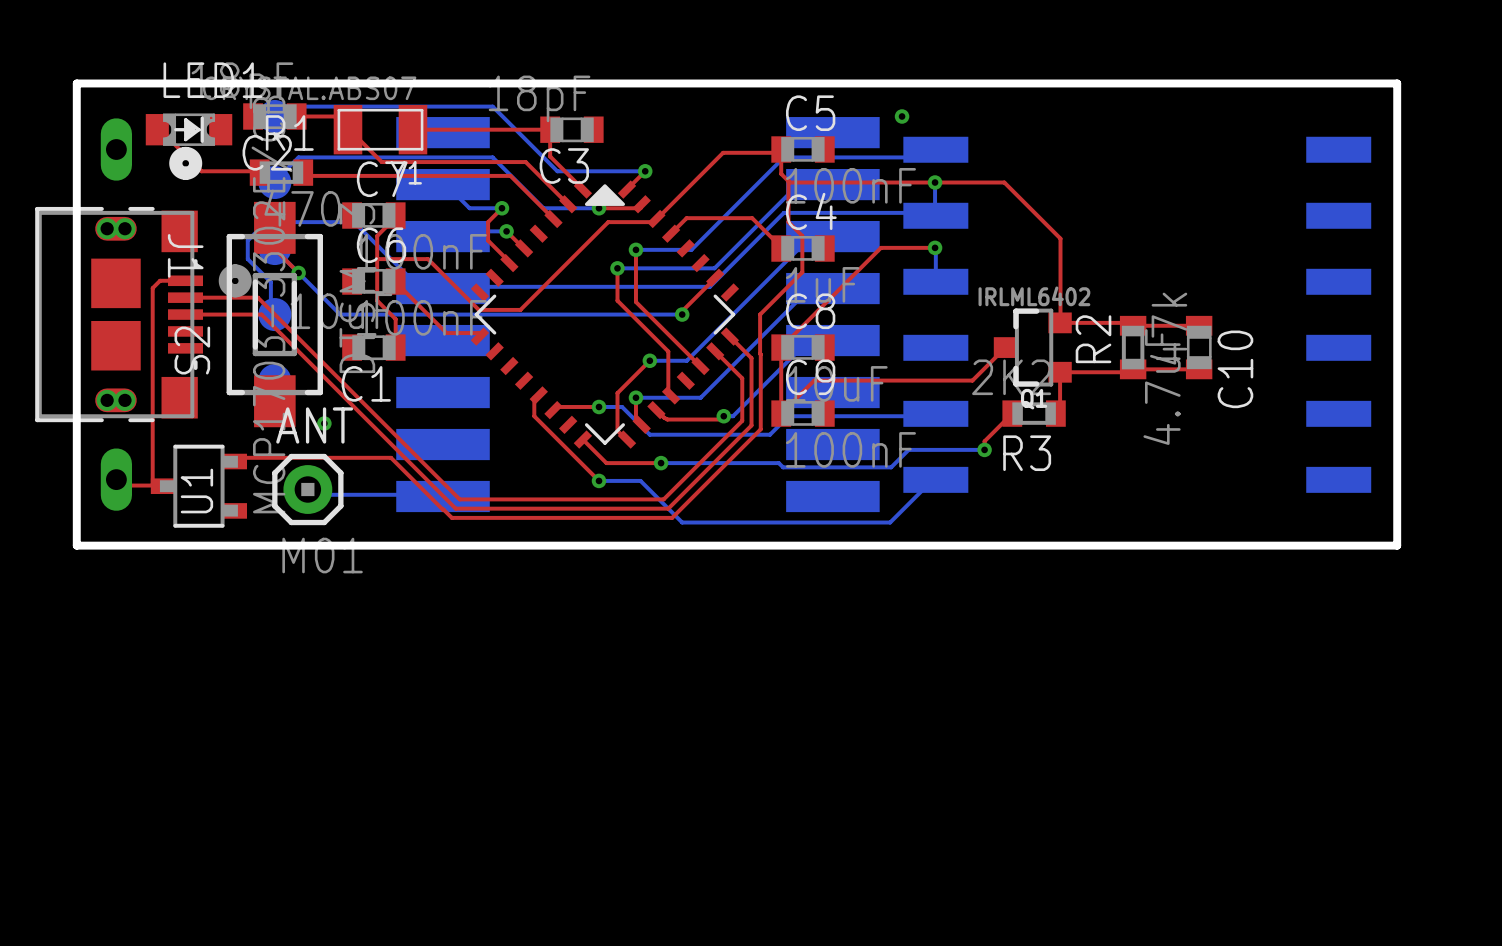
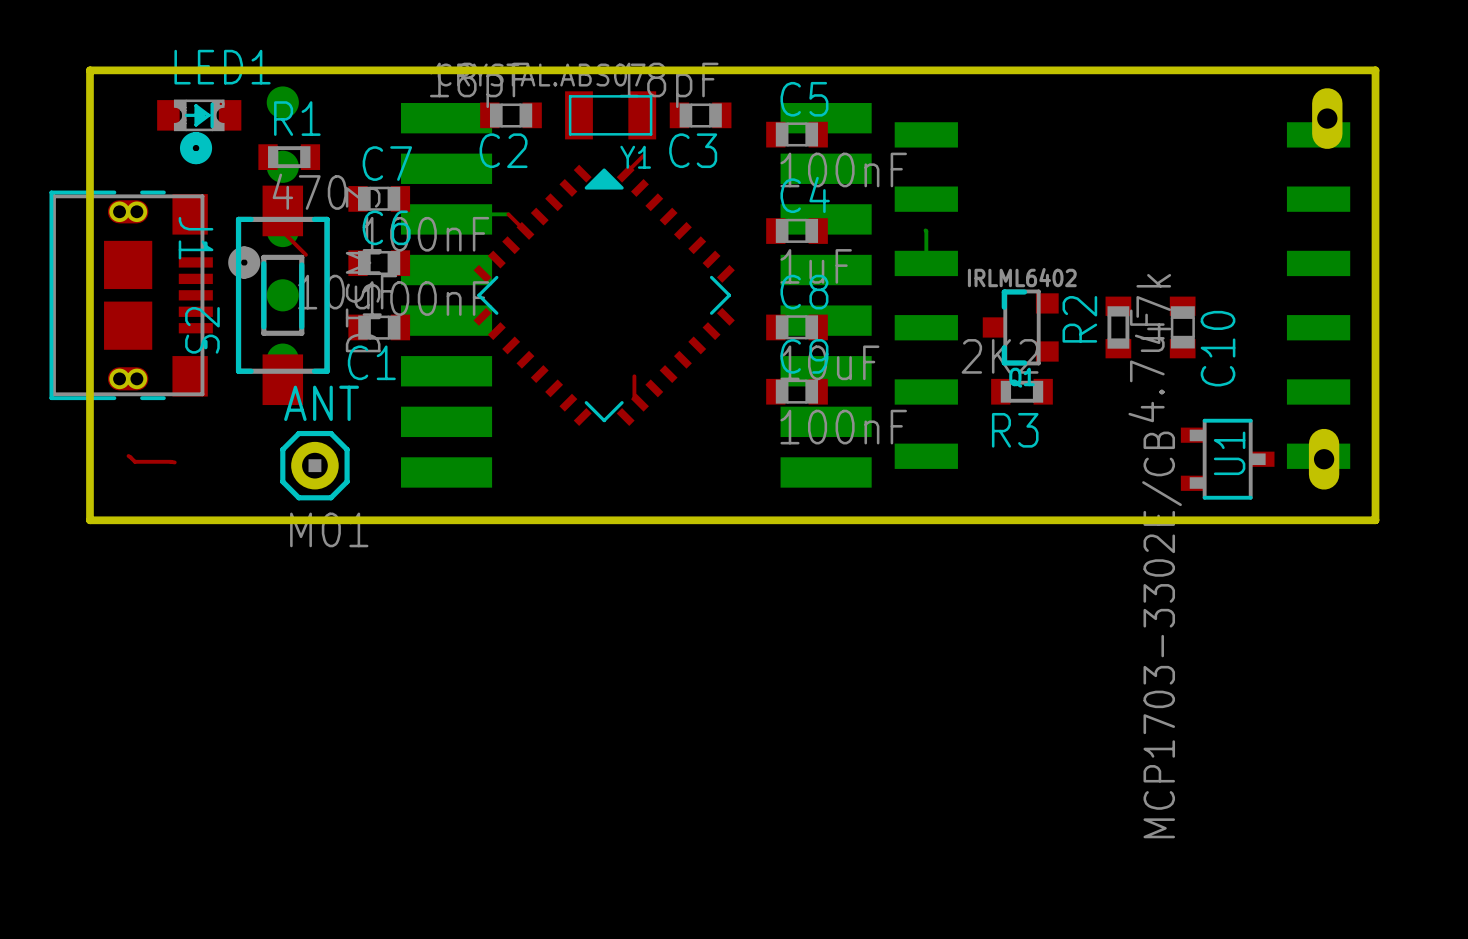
bottom track: (274, 116) (284, 106) (492, 106) (557, 171) (645, 171) -> none
C2 position: (274, 116) -> (510, 115)
top track: (296, 116) (334, 116) (381, 162) (525, 162) (567, 204) -> none
via: (902, 116) -> none
top track: (157, 129) (159, 129) (201, 171) (259, 172) -> none
Y1 position: (380, 129) -> (610, 115)
top track: (412, 129) (550, 129) (550, 156) (582, 189) -> none
C3 position: (571, 129) -> (700, 115)
part: none -> (1327, 118)
part: (116, 149) -> none
bottom track: (935, 149) (927, 157) (783, 157) (691, 249) (635, 249) -> none
via: (645, 171) -> none
top track: (303, 172) (303, 175) (510, 175) (553, 218) -> none
top track: (788, 180) (788, 222) (802, 235) (802, 272) (760, 314) (760, 429) (672, 517) (451, 517) (391, 457) (238, 457) (234, 461) -> none
bottom track: (274, 182) (298, 157) (492, 157) (543, 208) (599, 208) -> none
bottom track: (935, 182) (935, 209) (931, 212) -> none
via: (935, 182) -> none
bottom track: (443, 184) (446, 185) (469, 208) (501, 208) -> none
bottom track: (832, 184) (797, 185) (714, 268) (617, 268) -> none
top track: (641, 204) (640, 208) (599, 208) -> none
top track: (501, 208) (488, 222) (488, 240) (509, 263) -> none
via: (501, 208) -> none
via: (599, 208) -> none
bottom track: (931, 212) (783, 212) (709, 286) (446, 286) (443, 288) (441, 286) (418, 286) (354, 222) (266, 222) (247, 240) (247, 259) (270, 282) (270, 314) (274, 314) -> none
top track: (395, 215) (377, 235) (377, 300) (395, 319) (395, 347) -> none
via: (506, 231) -> none
top track: (671, 233) (686, 218) (752, 218) (781, 248) -> none
bottom track: (832, 236) (830, 240) (806, 240) (686, 360) (649, 360) -> none
top track: (935, 247) (880, 247) (781, 347) (781, 413) (814, 380) (972, 380) (1005, 347) -> none
via: (935, 247) -> none
bottom track: (274, 248) (340, 314) (682, 314) -> none
top track: (635, 249) (635, 302) (700, 366) -> none
via: (635, 249) -> none
top track: (377, 259) (428, 259) (478, 309) (520, 309) (608, 222) (654, 222) (723, 152) (779, 152) (781, 149) (781, 173) (789, 182) (1004, 182) (1060, 238) (1060, 322) (1199, 325) -> none
top track: (617, 268) (617, 300) (668, 351) (668, 393) (671, 395) -> none
via: (617, 268) -> none
via: (298, 272) -> none
top track: (715, 278) (682, 311) (682, 314) -> none
top track: (185, 280) (160, 280) (152, 288) (152, 485) -> none
top track: (395, 281) (446, 333) (478, 333) (479, 336) -> none
bottom track: (832, 288) (830, 291) (806, 291) (700, 397) (635, 397) -> none
top track: (185, 297) (257, 297) (459, 499) (663, 499) (742, 420) (742, 378) (715, 351) -> none
top track: (185, 314) (261, 314) (455, 508) (668, 508) (751, 425) (751, 358) (729, 336) -> none
via: (682, 314) -> none
bottom track: (832, 340) (830, 342) (806, 342) (733, 416) (723, 416) -> none
top track: (649, 360) (617, 393) (617, 430) (627, 439) -> none
via: (649, 360) -> none
top track: (1199, 369) (1060, 372) (1060, 409) (1055, 413) -> none
top track: (538, 395) (534, 397) (534, 416) (599, 480) -> none
via: (635, 397) -> none
top track: (599, 406) (557, 406) (553, 410) -> none
bottom track: (599, 406) (622, 406) (649, 434) (770, 434) (788, 416) (931, 416) (935, 413) -> none
via: (599, 406) -> none
top track: (656, 410) (667, 419) (720, 419) (723, 416) -> none
top track: (1012, 413) (984, 441) (984, 449) -> none
via: (723, 416) -> none
via: (324, 423) -> none
top track: (582, 439) (606, 463) (661, 463) -> none
bottom track: (984, 449) (908, 449) (891, 467) (783, 467) (778, 463) (661, 463) -> none
via: (984, 449) -> none
via: (661, 463) -> none
part: (116, 479) -> none
bottom track: (935, 479) (931, 480) (890, 522) (682, 522) (640, 480) (599, 480) -> none
via: (599, 480) -> none
part: none -> (1324, 459)
U1 rotation: 0° (198, 486) -> 180° (1227, 459)
U1 position: (198, 486) -> (1227, 459)
bottom track: (307, 489) (312, 494) (441, 494) (443, 496) -> none

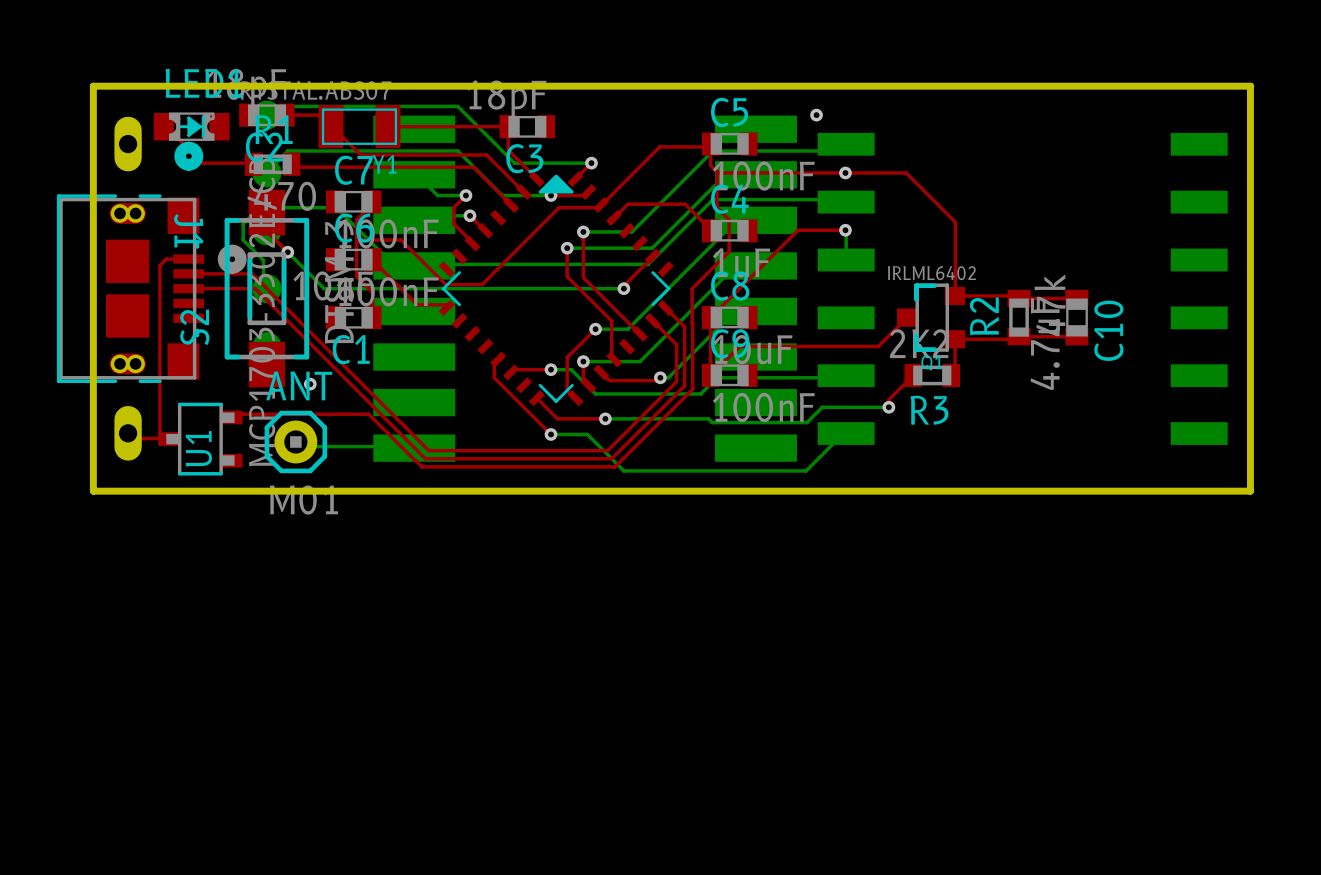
bottom track: none -> (266, 115) (275, 106) (457, 106) (514, 163) (591, 163)
top track: none -> (286, 115) (319, 115) (360, 155) (486, 155) (523, 191)
via: none -> (816, 115)
top track: none -> (163, 126) (166, 126) (202, 163) (253, 164)
top track: none -> (387, 126) (508, 126) (508, 150) (536, 179)
C2 position: (510, 115) -> (266, 115)
Y1 position: (610, 115) -> (359, 126)
C3 position: (700, 115) -> (527, 126)
part: (1327, 118) -> none
part: none -> (128, 144)
bottom track: none -> (846, 144) (838, 150) (712, 150) (631, 231) (583, 231)
via: none -> (591, 163)
top track: none -> (291, 164) (291, 167) (473, 167) (511, 204)
top track: none -> (717, 171) (717, 207) (729, 219) (729, 251) (692, 288) (692, 389) (615, 466) (422, 466) (368, 414) (235, 414) (231, 417)
bottom track: none -> (266, 172) (287, 150) (457, 150) (502, 195) (551, 195)
via: none -> (845, 172)
bottom track: none -> (414, 174) (417, 175) (437, 195) (465, 195)
bottom track: none -> (755, 174) (725, 175) (652, 248) (567, 248)
top track: none -> (588, 192) (587, 195) (551, 195)
top track: none -> (465, 195) (453, 207) (453, 223) (472, 243)
via: none -> (465, 195)
via: none -> (551, 195)
top track: none -> (372, 201) (356, 219) (356, 276) (372, 292) (372, 317)
bottom track: none -> (846, 202) (842, 199) (712, 199) (648, 264) (417, 264) (414, 265) (393, 264) (336, 207) (259, 207) (243, 223) (243, 240) (263, 260) (263, 288) (266, 288)
via: none -> (470, 215)
top track: none -> (614, 217) (627, 204) (685, 204) (710, 230)
bottom track: none -> (755, 220) (753, 223) (733, 223) (627, 329) (595, 329)
top track: none -> (845, 230) (798, 230) (710, 317) (710, 375) (739, 346) (878, 346) (907, 317)
via: none -> (845, 230)
bottom track: none -> (266, 230) (324, 288) (623, 288)
top track: none -> (583, 231) (583, 277) (639, 333)
via: none -> (583, 231)
top track: none -> (356, 240) (401, 240) (445, 284) (482, 284) (559, 207) (599, 207) (659, 146) (708, 146) (710, 144) (710, 165) (718, 172) (906, 172) (955, 222) (955, 295) (1076, 298)
top track: none -> (567, 248) (567, 276) (611, 321) (611, 357) (614, 359)
via: none -> (567, 248)
via: none -> (287, 252)
top track: none -> (652, 256) (623, 285) (623, 288)
top track: none -> (188, 259) (166, 259) (159, 265) (159, 438)
top track: none -> (372, 259) (417, 304) (445, 304) (446, 308)
bottom track: none -> (755, 265) (753, 268) (733, 268) (640, 361) (583, 361)
top track: none -> (188, 273) (252, 273) (428, 450) (607, 450) (676, 381) (676, 344) (652, 320)
top track: none -> (188, 288) (255, 288) (425, 458) (611, 458) (684, 385) (684, 326) (665, 308)
via: none -> (623, 288)
bottom track: none -> (755, 311) (733, 312) (668, 377) (660, 377)
top track: none -> (595, 329) (567, 357) (567, 390) (575, 398)
via: none -> (595, 329)
top track: none -> (1076, 336) (955, 339) (955, 371) (951, 375)
top track: none -> (498, 359) (494, 361) (494, 377) (551, 434)
via: none -> (583, 361)
top track: none -> (551, 369) (514, 369) (511, 372)
bottom track: none -> (551, 369) (571, 369) (595, 393) (700, 393) (717, 377) (842, 377) (846, 375)
via: none -> (551, 369)
top track: none -> (601, 372) (610, 380) (657, 380) (660, 377)
top track: none -> (913, 375) (888, 399) (888, 407)
via: none -> (660, 377)
via: none -> (310, 384)
top track: none -> (536, 398) (557, 418) (605, 418)
bottom track: none -> (888, 407) (822, 407) (807, 422) (712, 422) (708, 418) (605, 418)
via: none -> (888, 407)
via: none -> (605, 418)
part: none -> (128, 433)
bottom track: none -> (846, 433) (842, 434) (806, 470) (623, 470) (587, 434) (551, 434)
via: none -> (551, 434)
U1 rotation: 0° (1227, 459) -> 180° (200, 439)
U1 position: (1227, 459) -> (200, 439)
part: (1324, 459) -> none
bottom track: none -> (295, 442) (299, 446) (414, 448)

